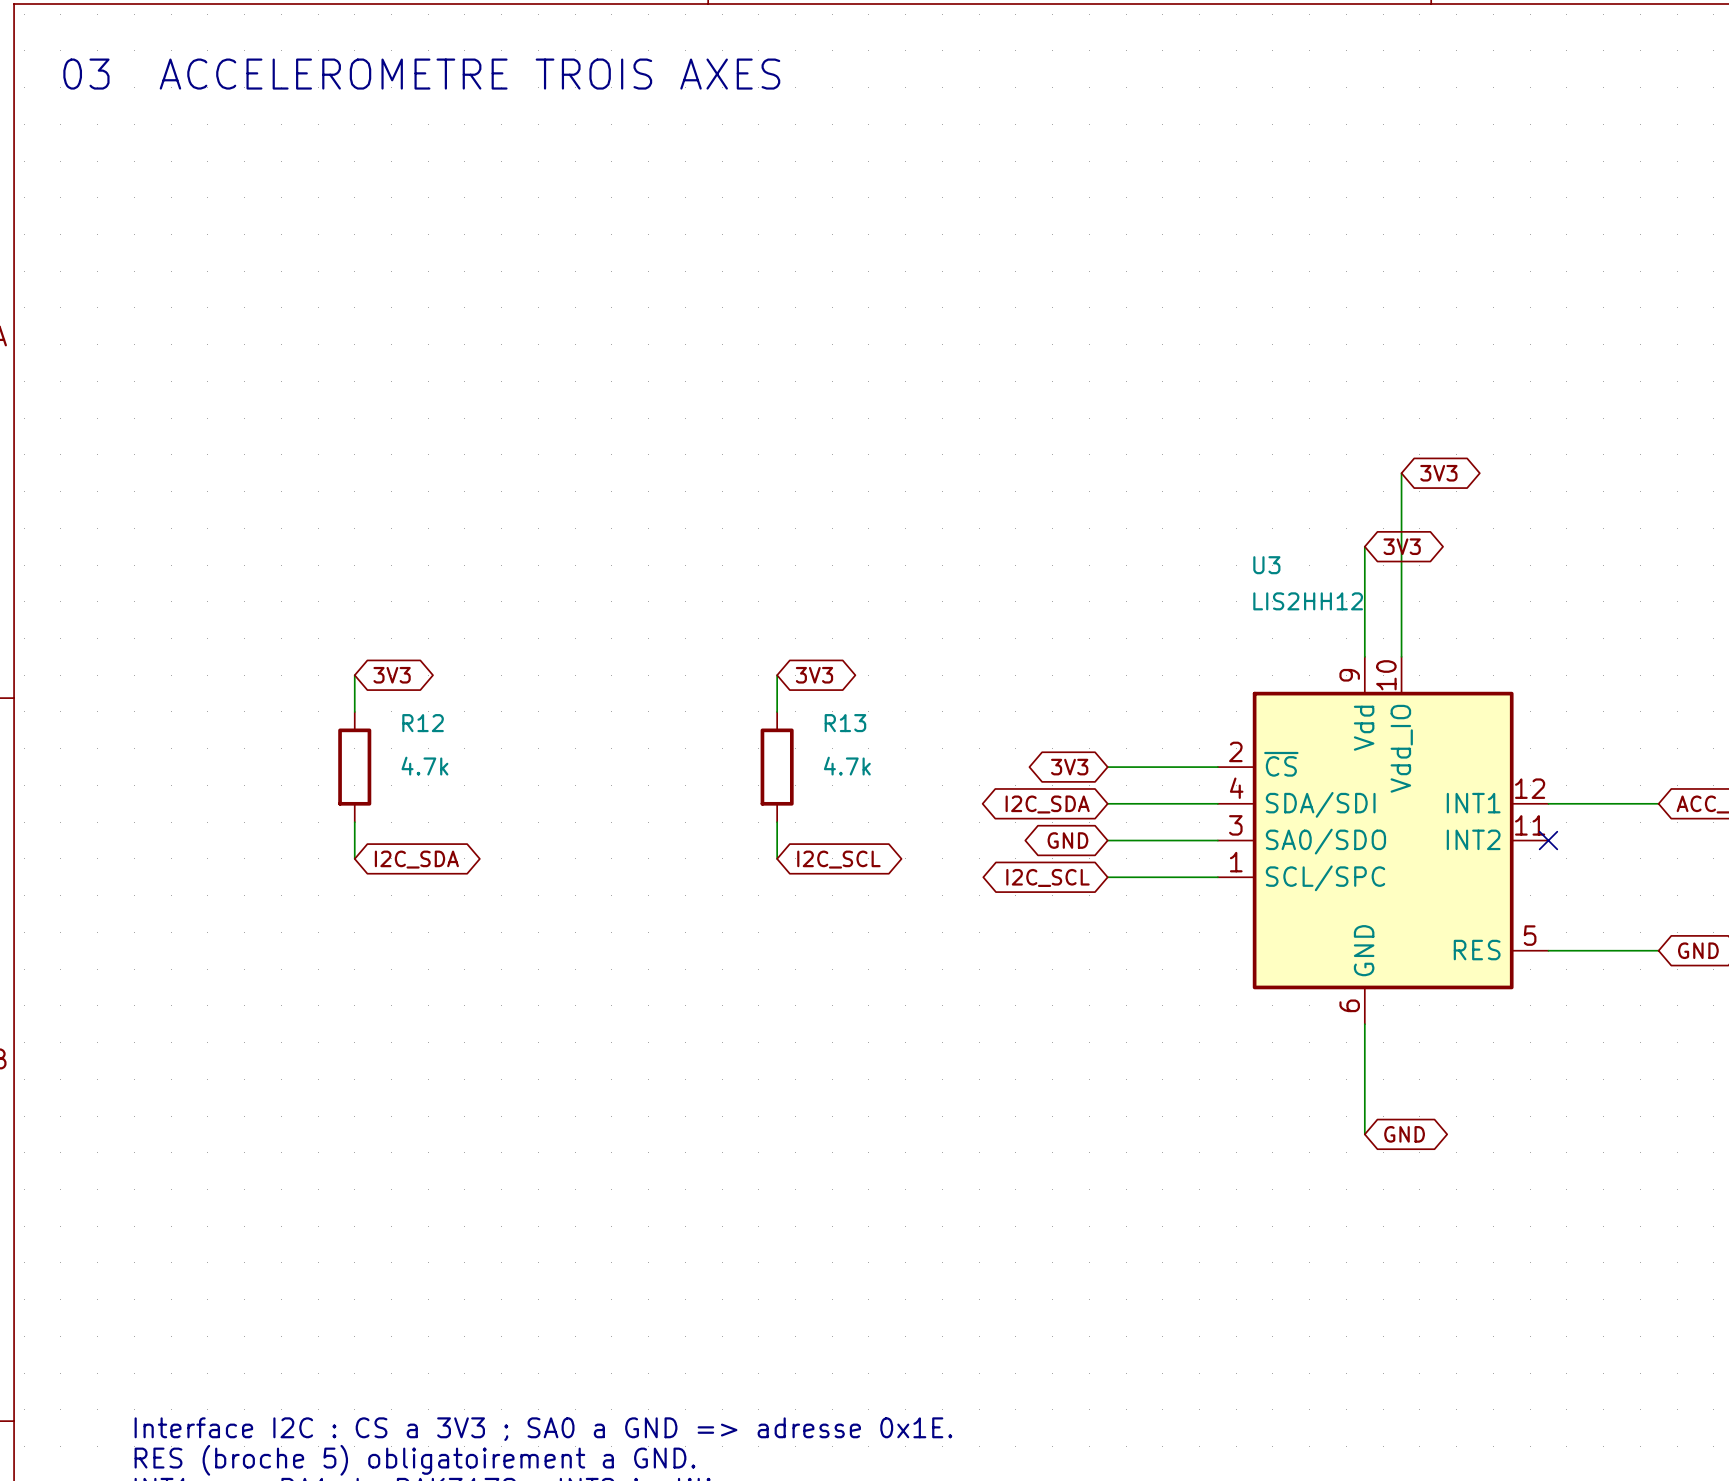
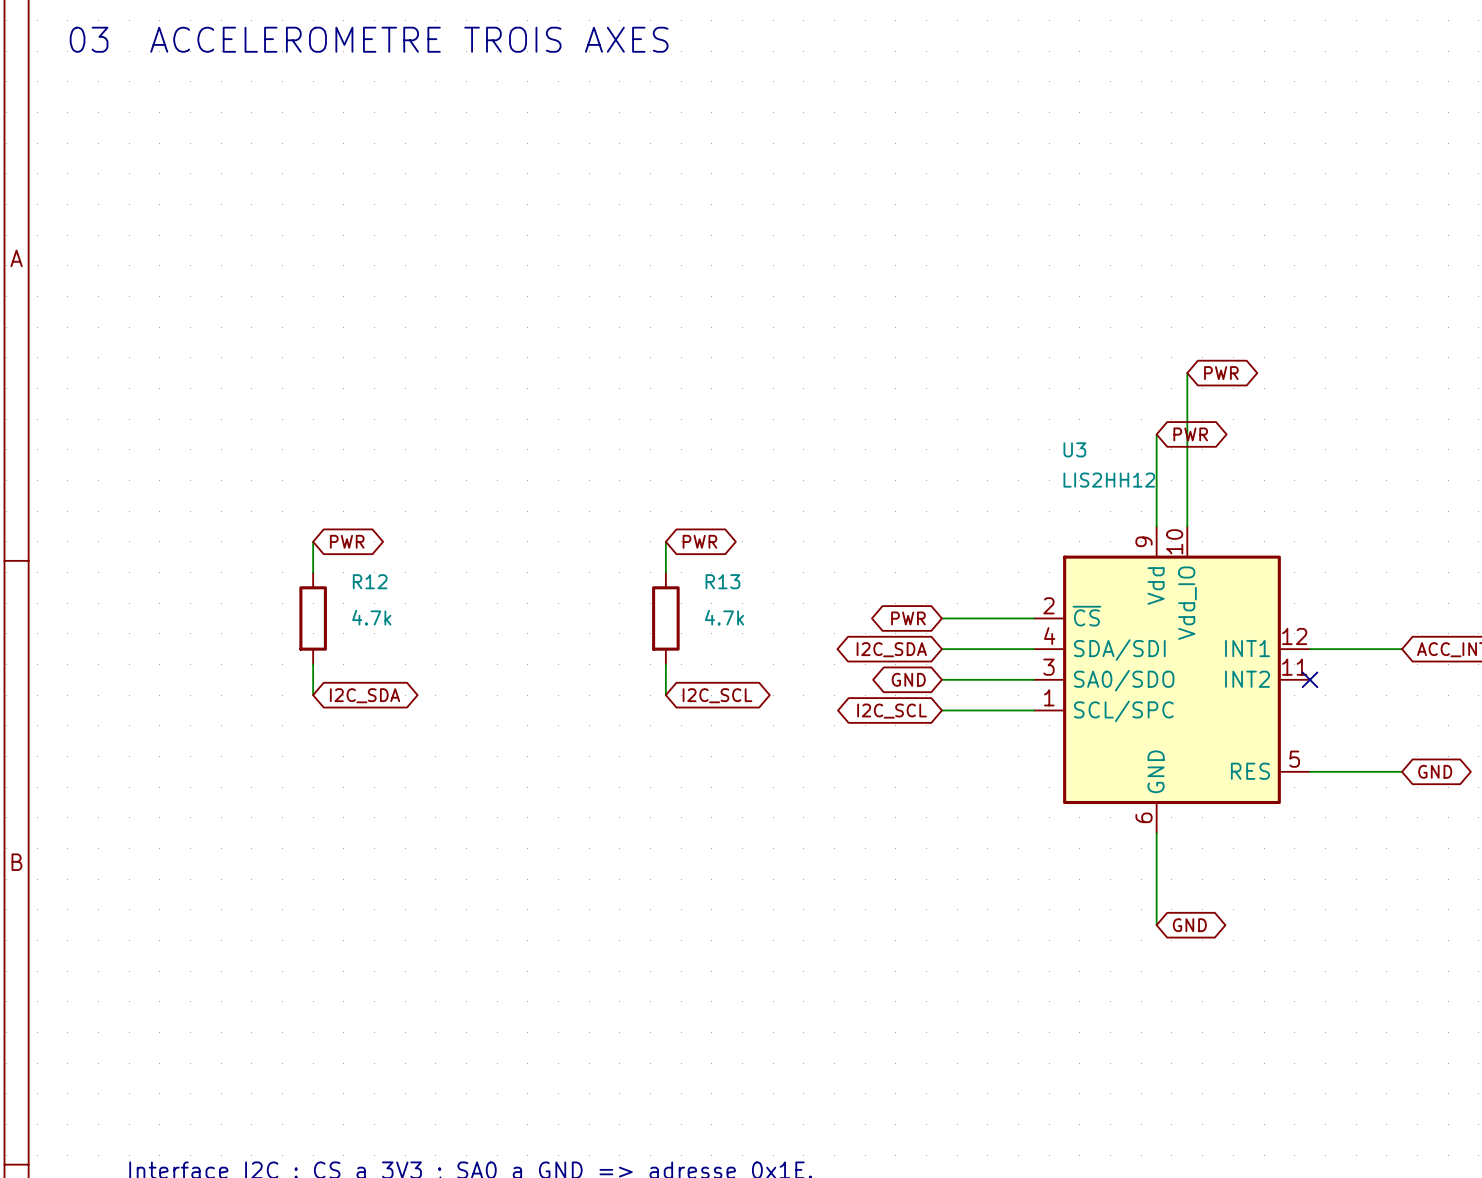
global label: 3V3 (1438, 473) -> PWR (1221, 373)
global label: 3V3 (1402, 546) -> PWR (1190, 434)
global label: 3V3 (392, 675) -> PWR (347, 541)
global label: 3V3 (814, 675) -> PWR (699, 541)
global label: 3V3 (1069, 767) -> PWR (908, 618)

